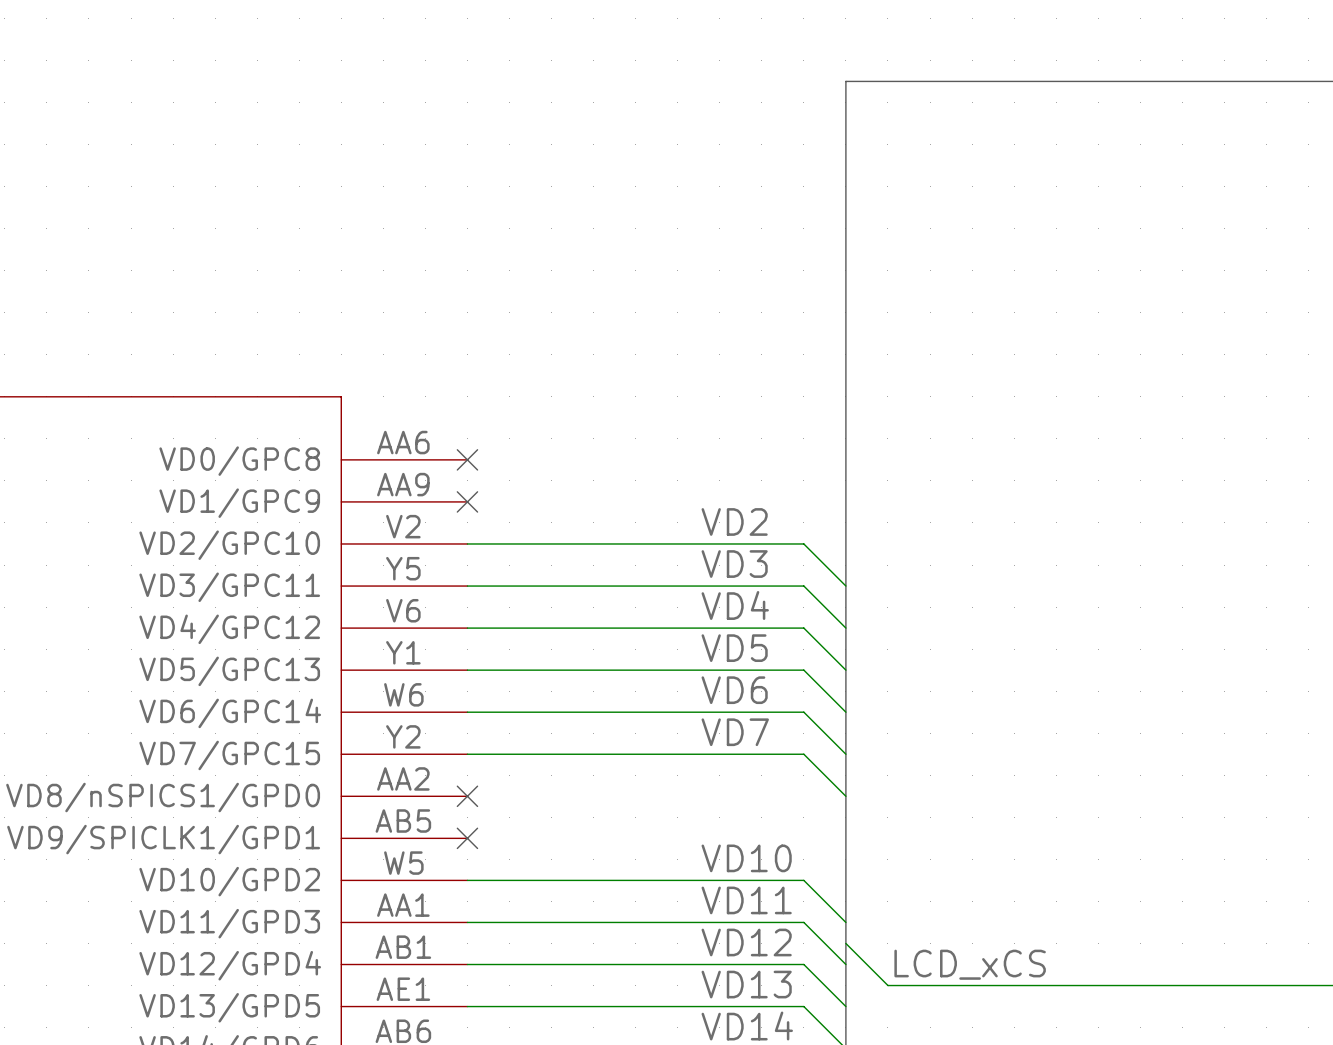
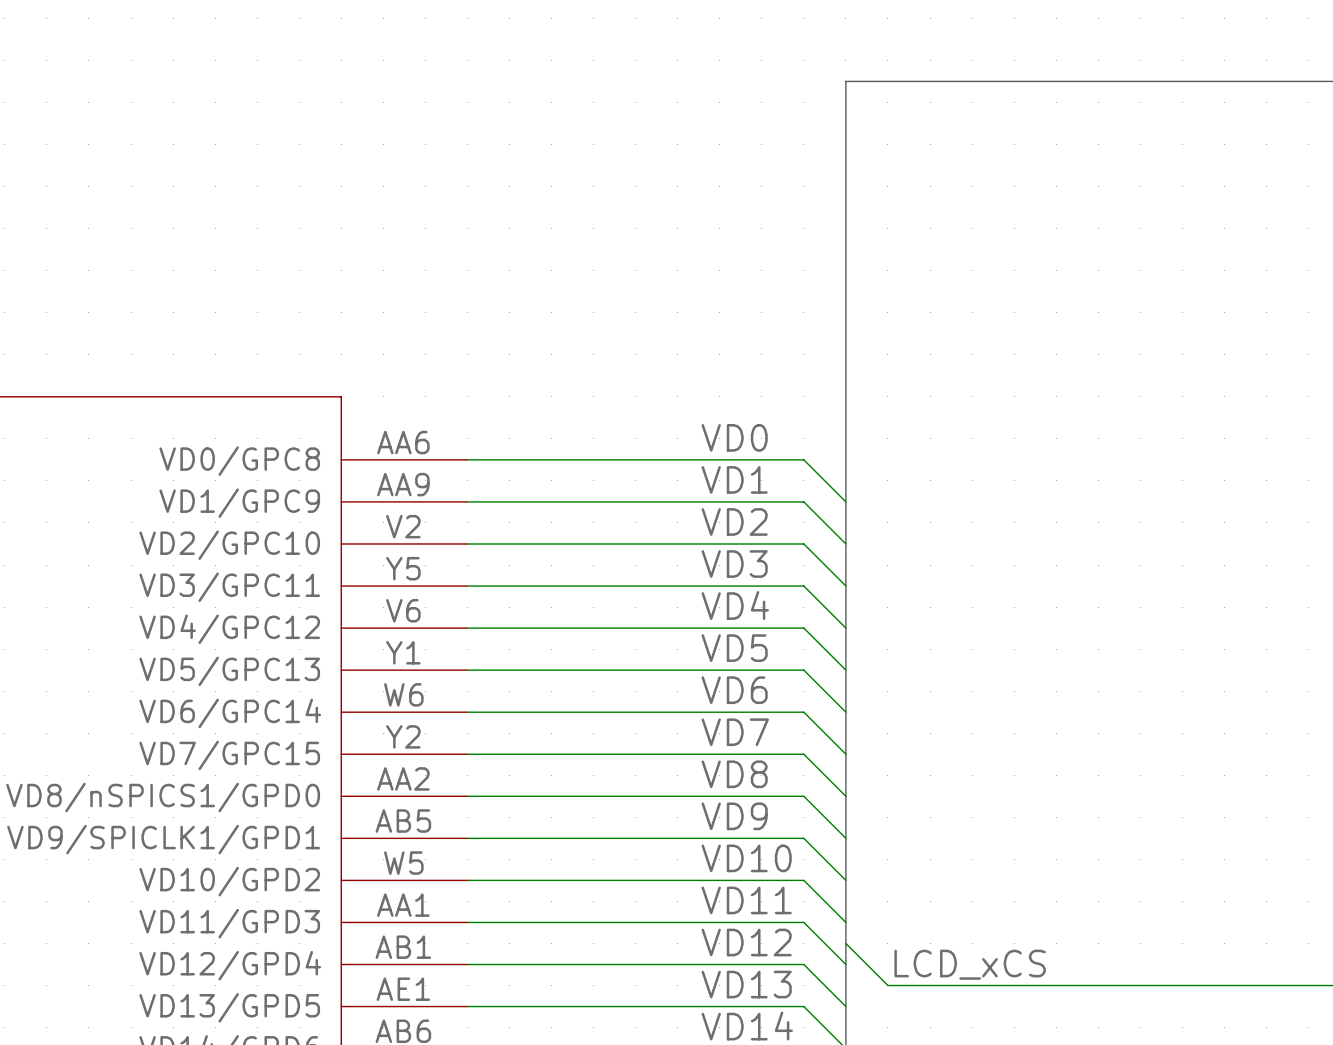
label: none -> VD0 (734, 437)
wire: none -> (467, 459) (803, 459) (845, 501)
no-connect mark: (467, 459) -> none
label: none -> VD1 (734, 479)
wire: none -> (467, 501) (803, 501) (845, 543)
no-connect mark: (467, 501) -> none
label: none -> VD8 (734, 774)
wire: none -> (467, 796) (803, 796) (845, 838)
no-connect mark: (467, 796) -> none
label: none -> VD9 (734, 816)
wire: none -> (467, 838) (803, 838) (845, 880)
no-connect mark: (467, 838) -> none

